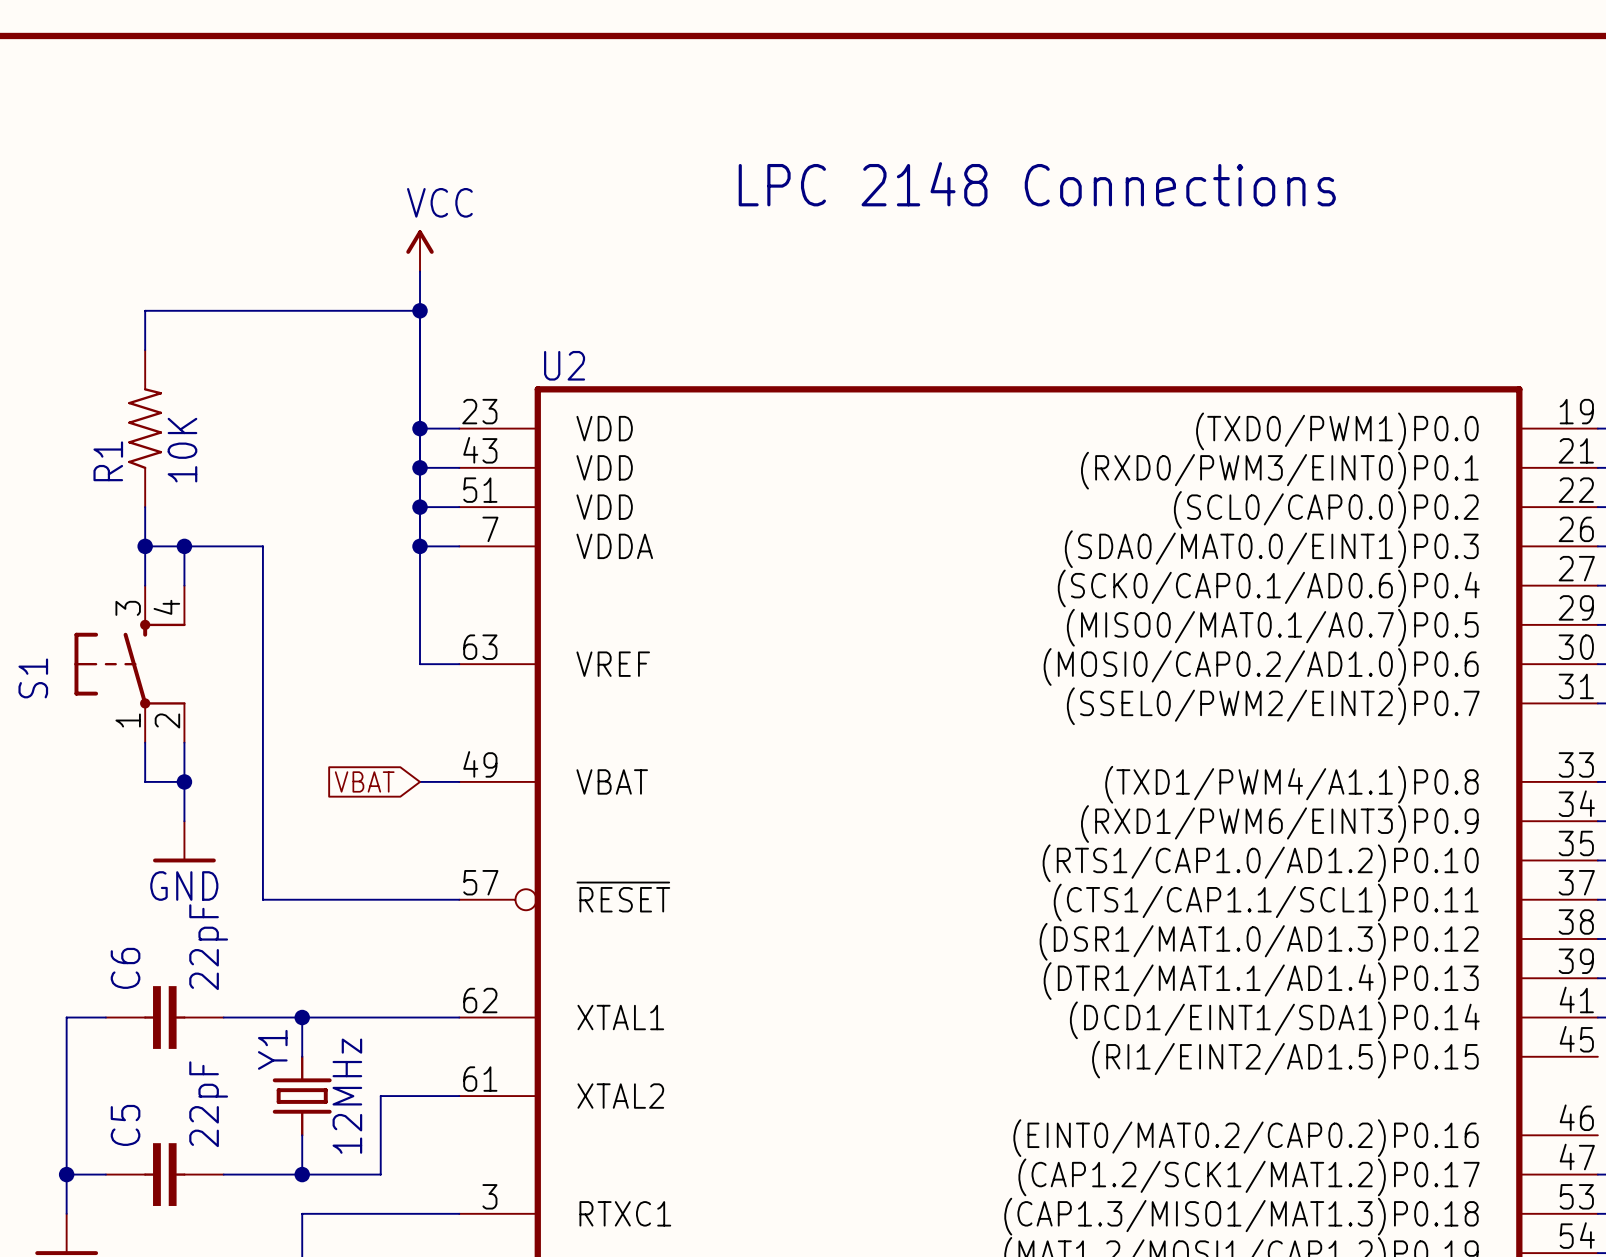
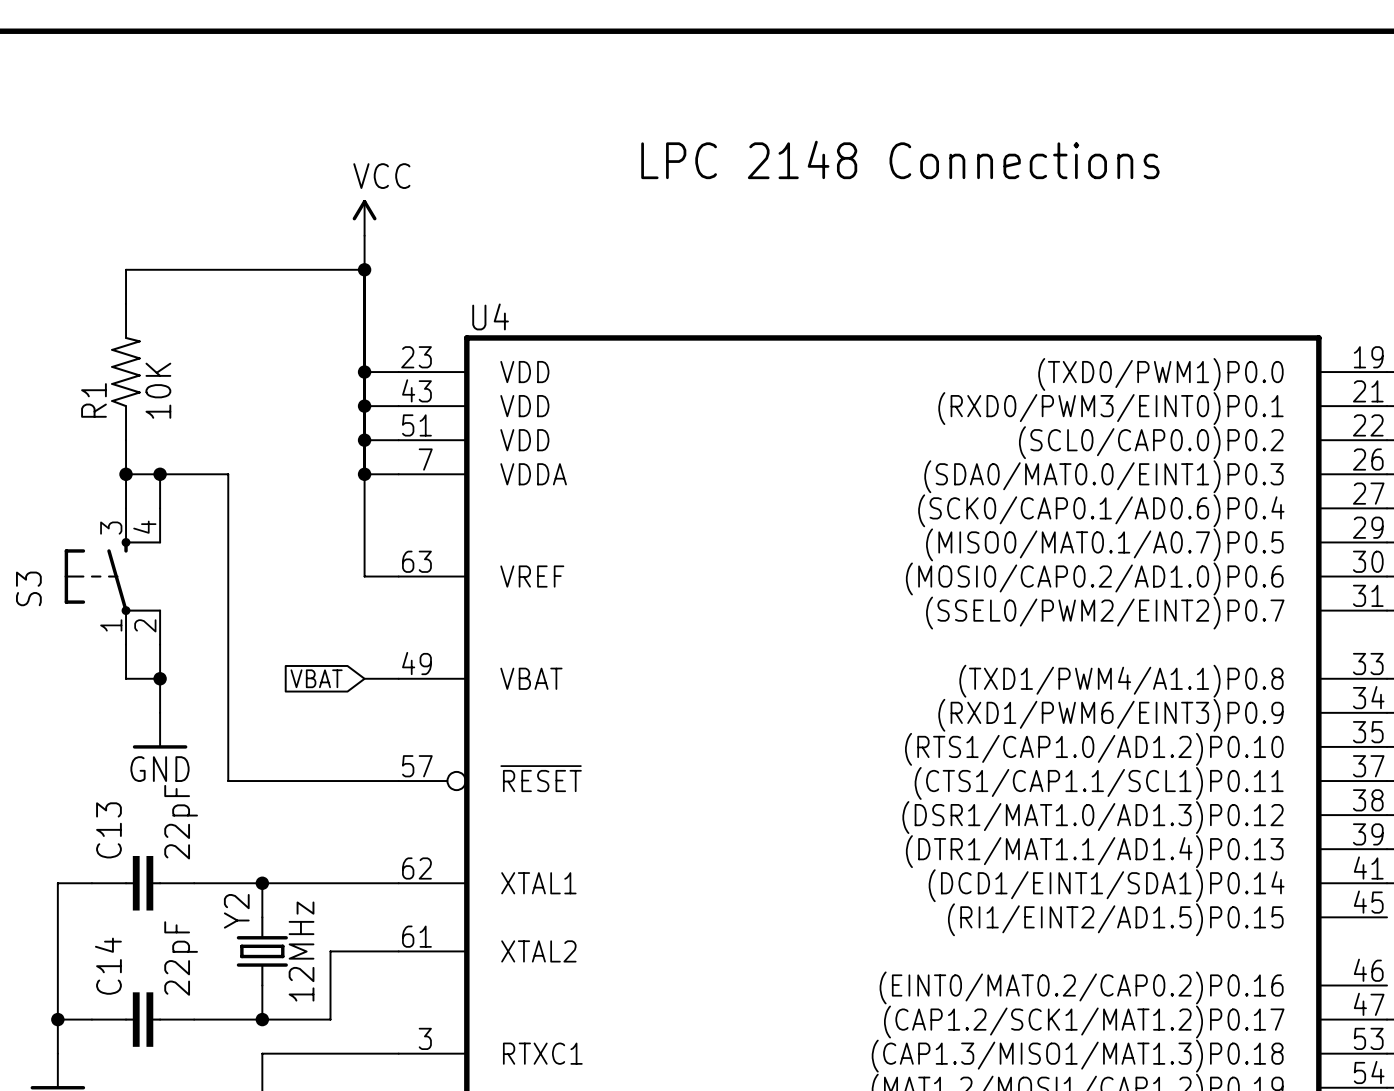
U2 name: U2 (564, 365) -> U4 (490, 316)
S1 name: S1 (33, 678) -> S3 (28, 588)
C6 name: C6 (125, 968) -> C13 (108, 830)
Y1 name: Y1 (272, 1049) -> Y2 (236, 911)
C5 name: C5 (125, 1125) -> C14 (108, 966)

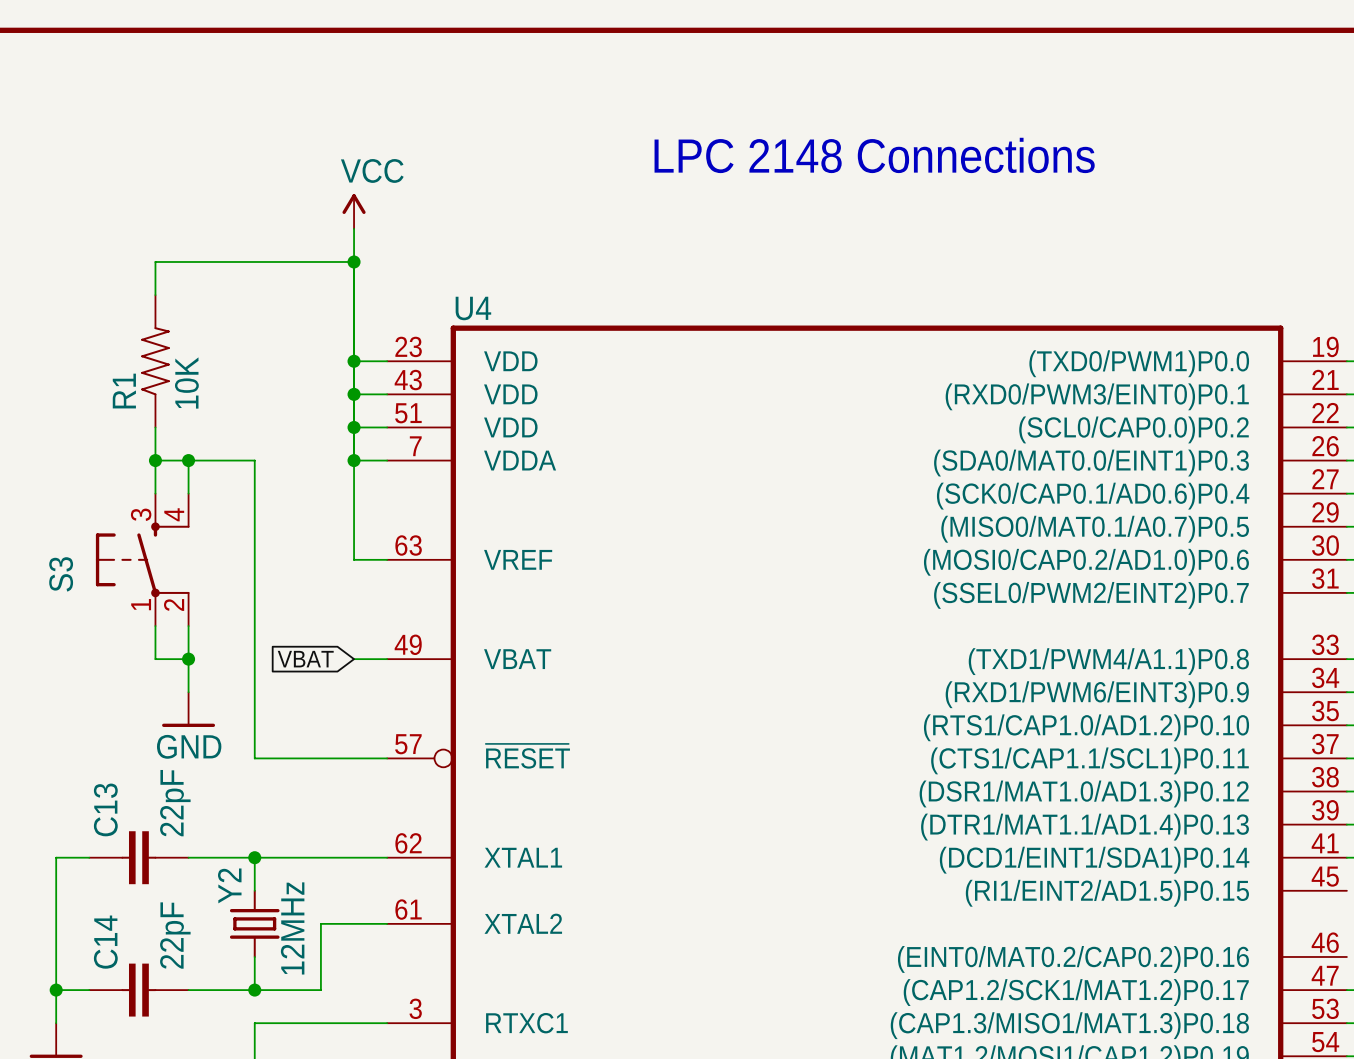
wire: (160, 269) (126, 269) (126, 303) -> (155, 261) (155, 295)
R1 position: (126, 372) -> (155, 361)
wire: (126, 440) (126, 508) -> (188, 626) (188, 692)
wire: (126, 474) (160, 474) -> (155, 427) (155, 460)
junction position: (126, 474) -> (188, 460)
wire: none -> (188, 460) (188, 493)
wire: (228, 474) (228, 781) (262, 781) -> (221, 460) (254, 460) (254, 758)
S3 position: (112, 576) -> (142, 559)
wire: (126, 644) (126, 678) (160, 678) (160, 712) -> none
wire: none -> (155, 659) (188, 659)
junction position: (160, 678) -> (188, 659)
power symbol position: GND (160, 730) -> GND (188, 709)

